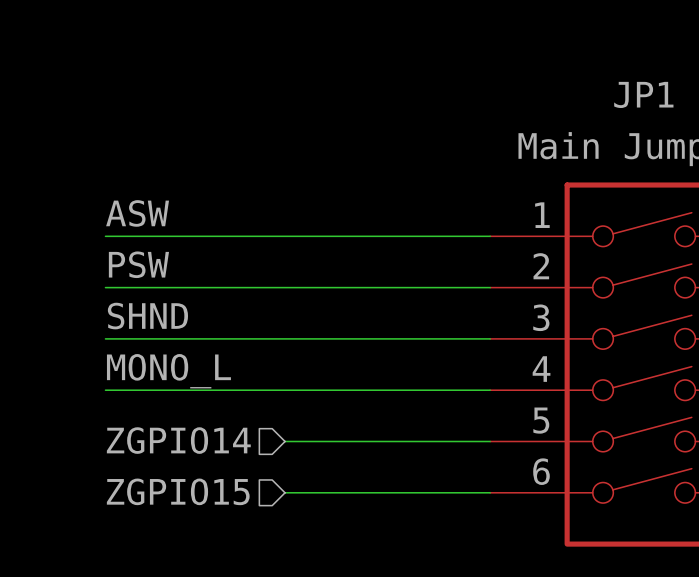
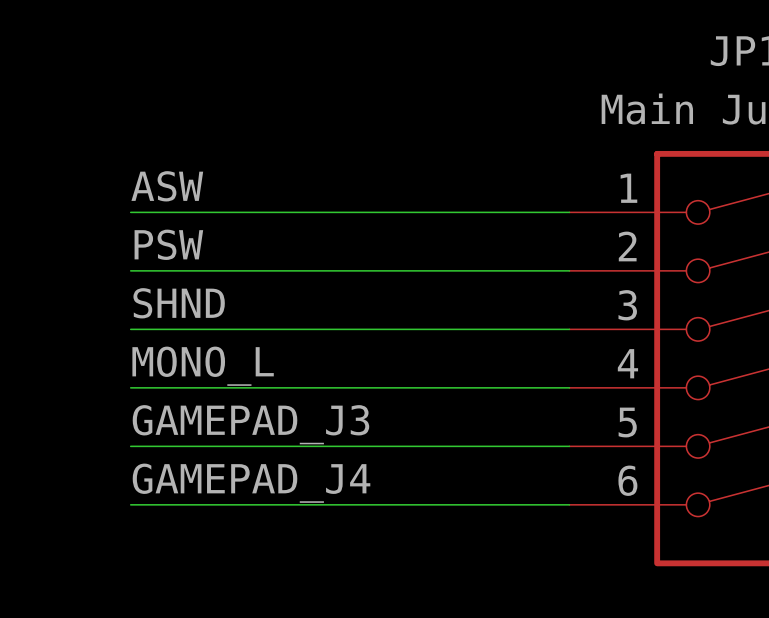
label: none -> GAMEPAD_J3 (250, 424)
hierarchical label: ZGPIO14 (178, 440) -> none
wire: none -> (130, 446) (335, 446)
label: none -> GAMEPAD_J4 (251, 483)
hierarchical label: ZGPIO15 (178, 491) -> none
wire: none -> (130, 504) (335, 504)

